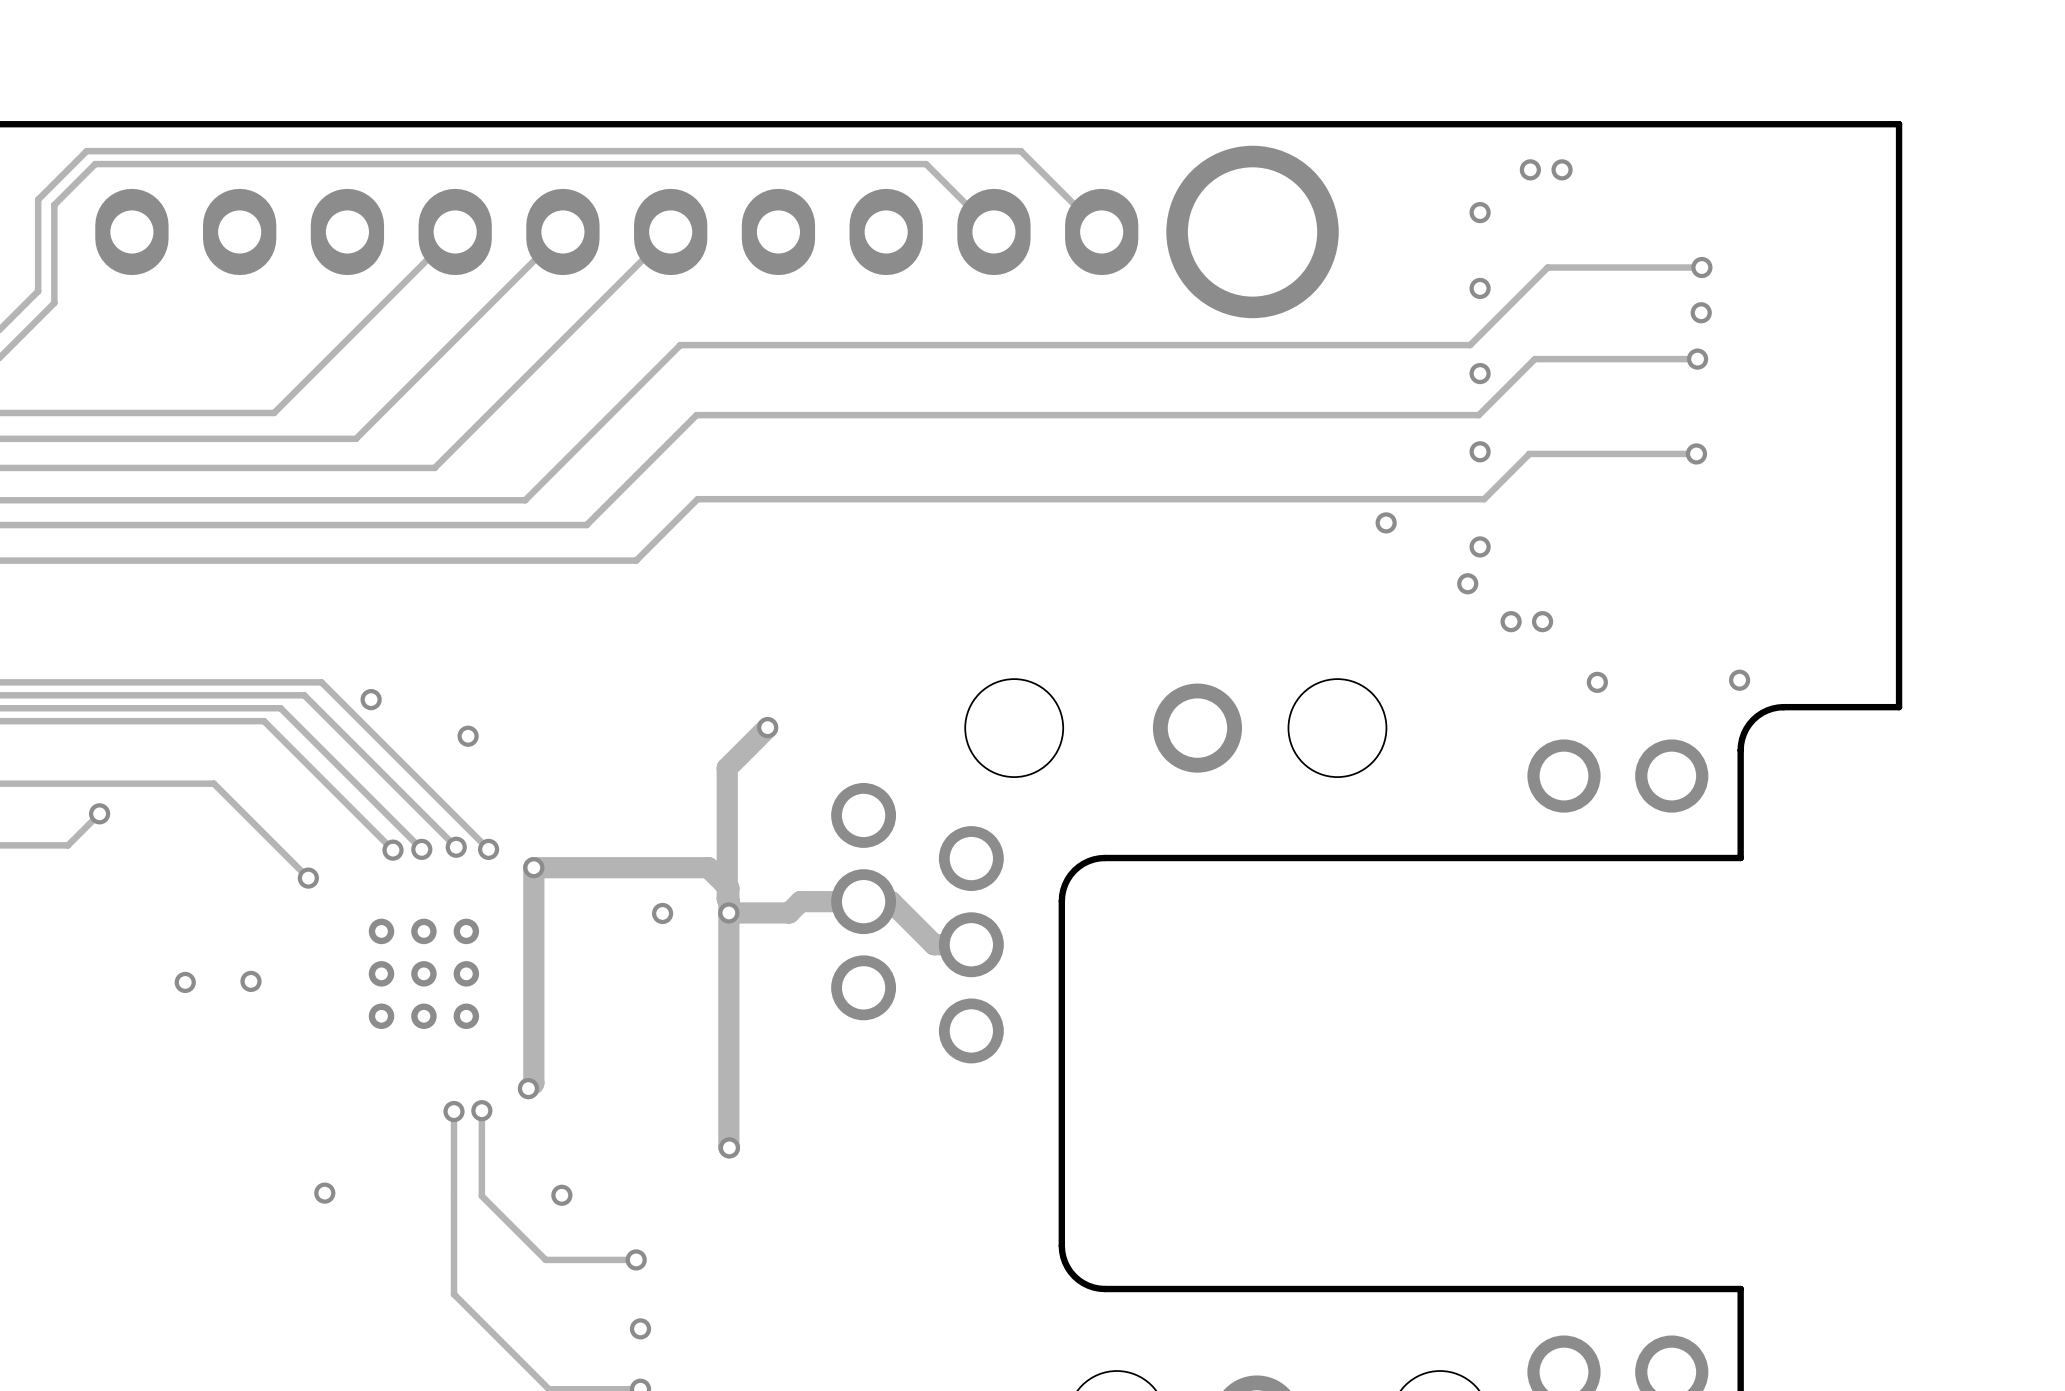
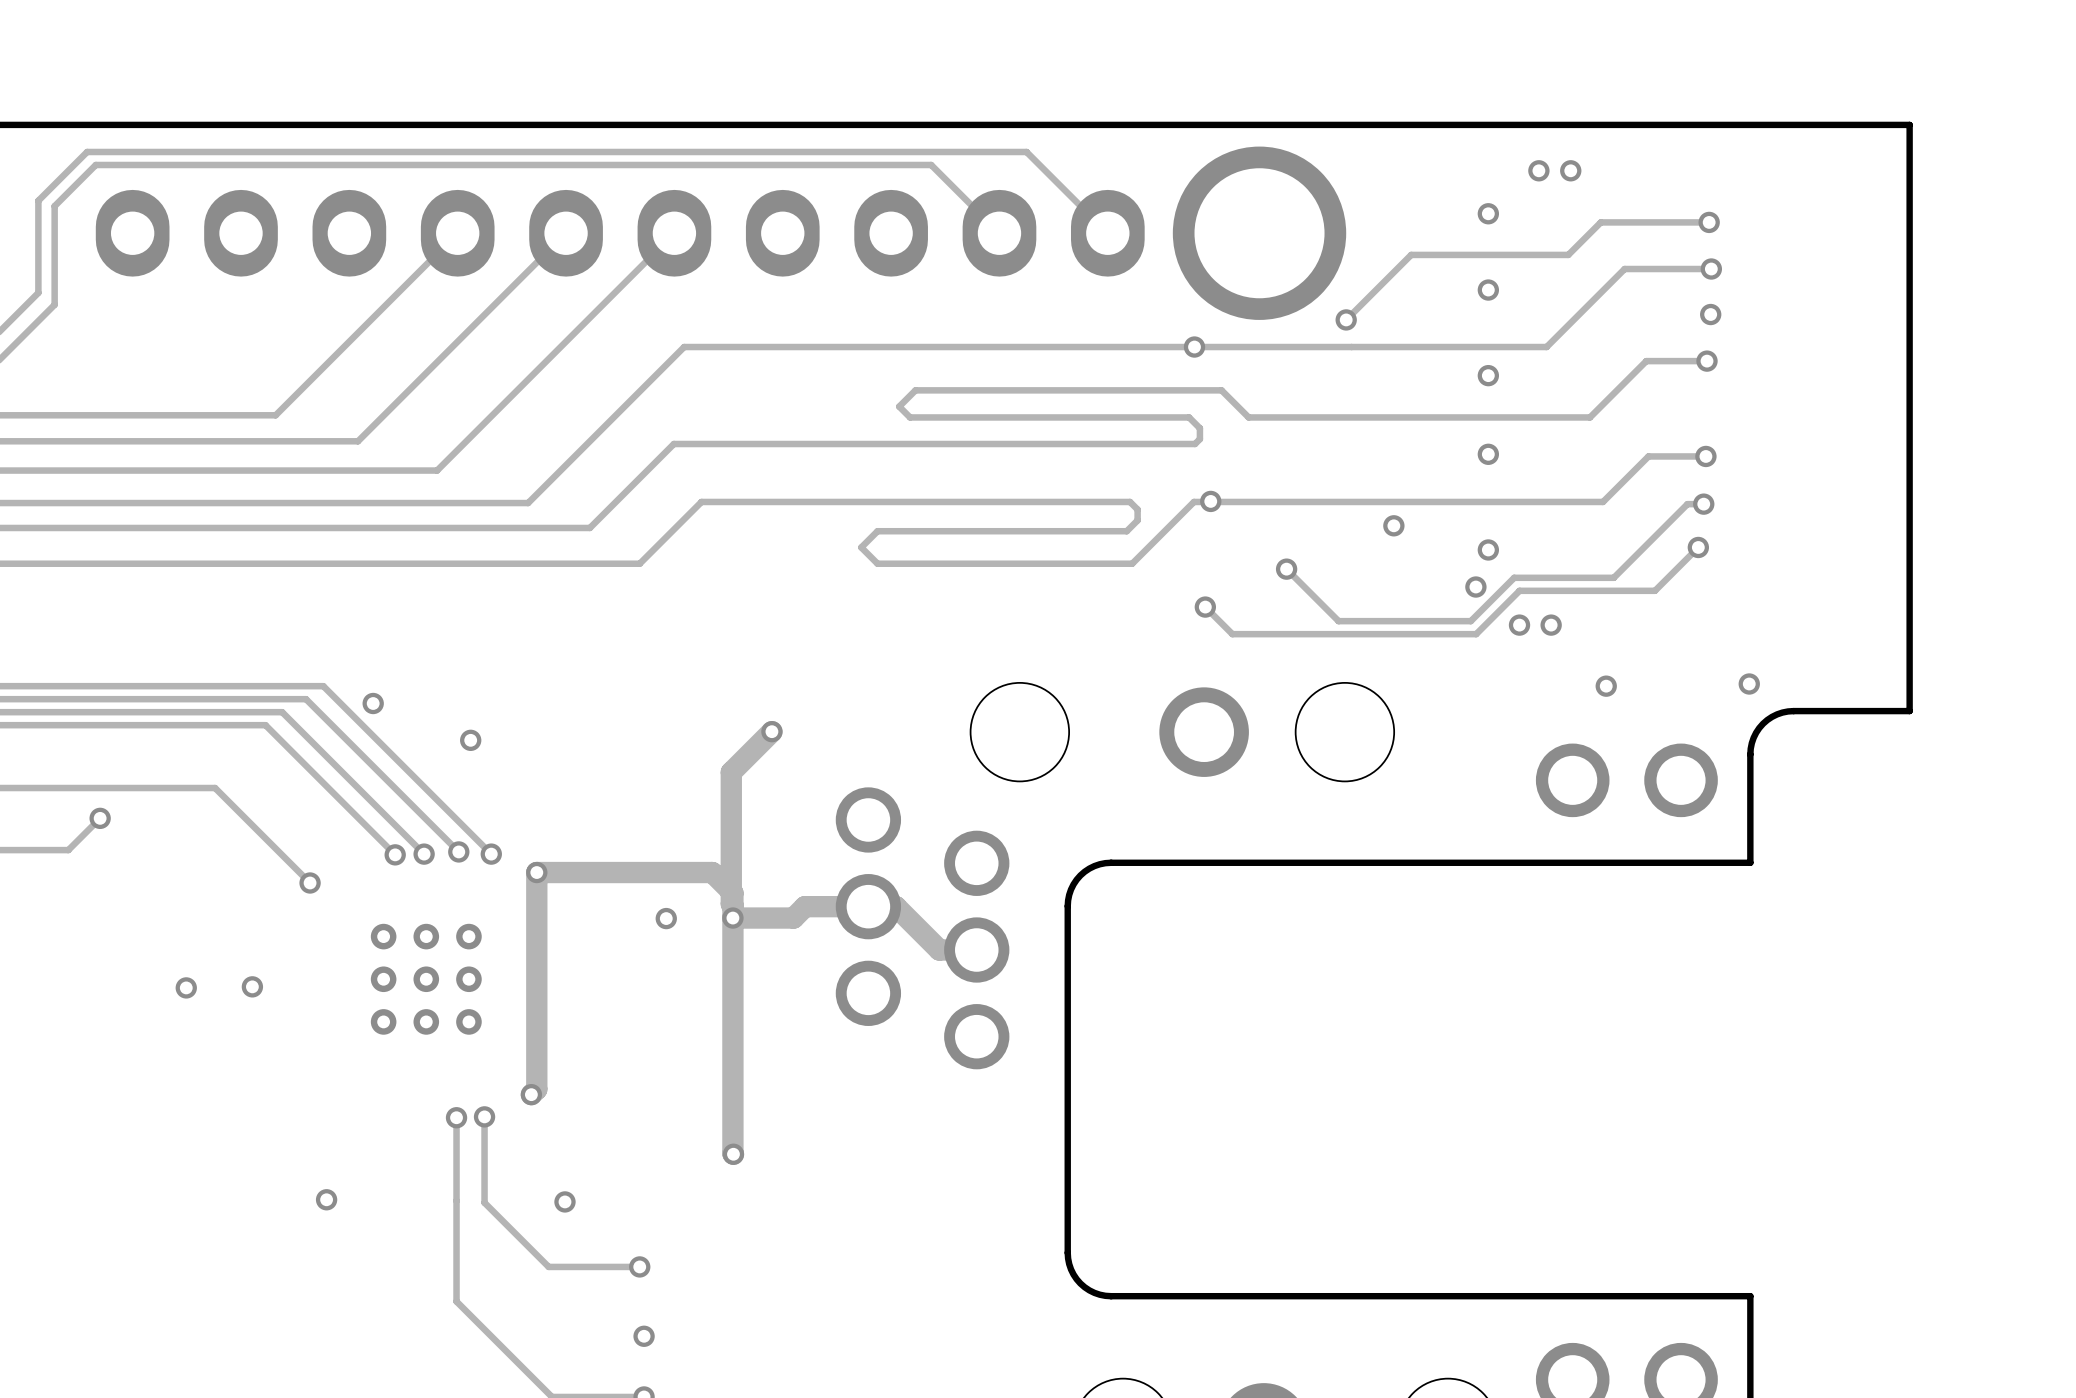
track: none -> (1709, 222) (1600, 222) (1568, 254) (1411, 254) (1346, 319)
via: none -> (1709, 222)
track: (1615, 267) (1547, 267) (1470, 345) -> (1624, 269) (1546, 347) (1478, 347)
via: none -> (1346, 319)
via: none -> (1194, 347)
track: (1637, 359) (1534, 359) (1478, 415) -> (1646, 361) (1589, 417) (1487, 417)
track: (905, 415) (696, 415) (670, 441) -> (1189, 417) (1199, 428) (1199, 439) (1195, 444) (673, 444)
track: (1241, 415) (1182, 415) -> (1248, 417) (1221, 390) (915, 390) (899, 406) (910, 417)
track: (1639, 453) (1529, 453) (1484, 499) -> (1648, 456) (1602, 501) (1492, 501)
via: none -> (1210, 501)
track: (1187, 499) (1123, 499) -> (1193, 501) (1132, 563) (877, 563) (861, 547) (877, 531) (1126, 531) (1137, 520) (1137, 509) (1130, 501)
track: none -> (1703, 504) (1687, 504) (1613, 577) (1514, 577) (1470, 621) (1338, 621) (1286, 569)
via: none -> (1703, 504)
track: none -> (1698, 547) (1655, 590) (1519, 590) (1476, 634) (1232, 634) (1205, 607)
via: none -> (1698, 547)
via: none -> (1286, 569)
via: none -> (1205, 607)

